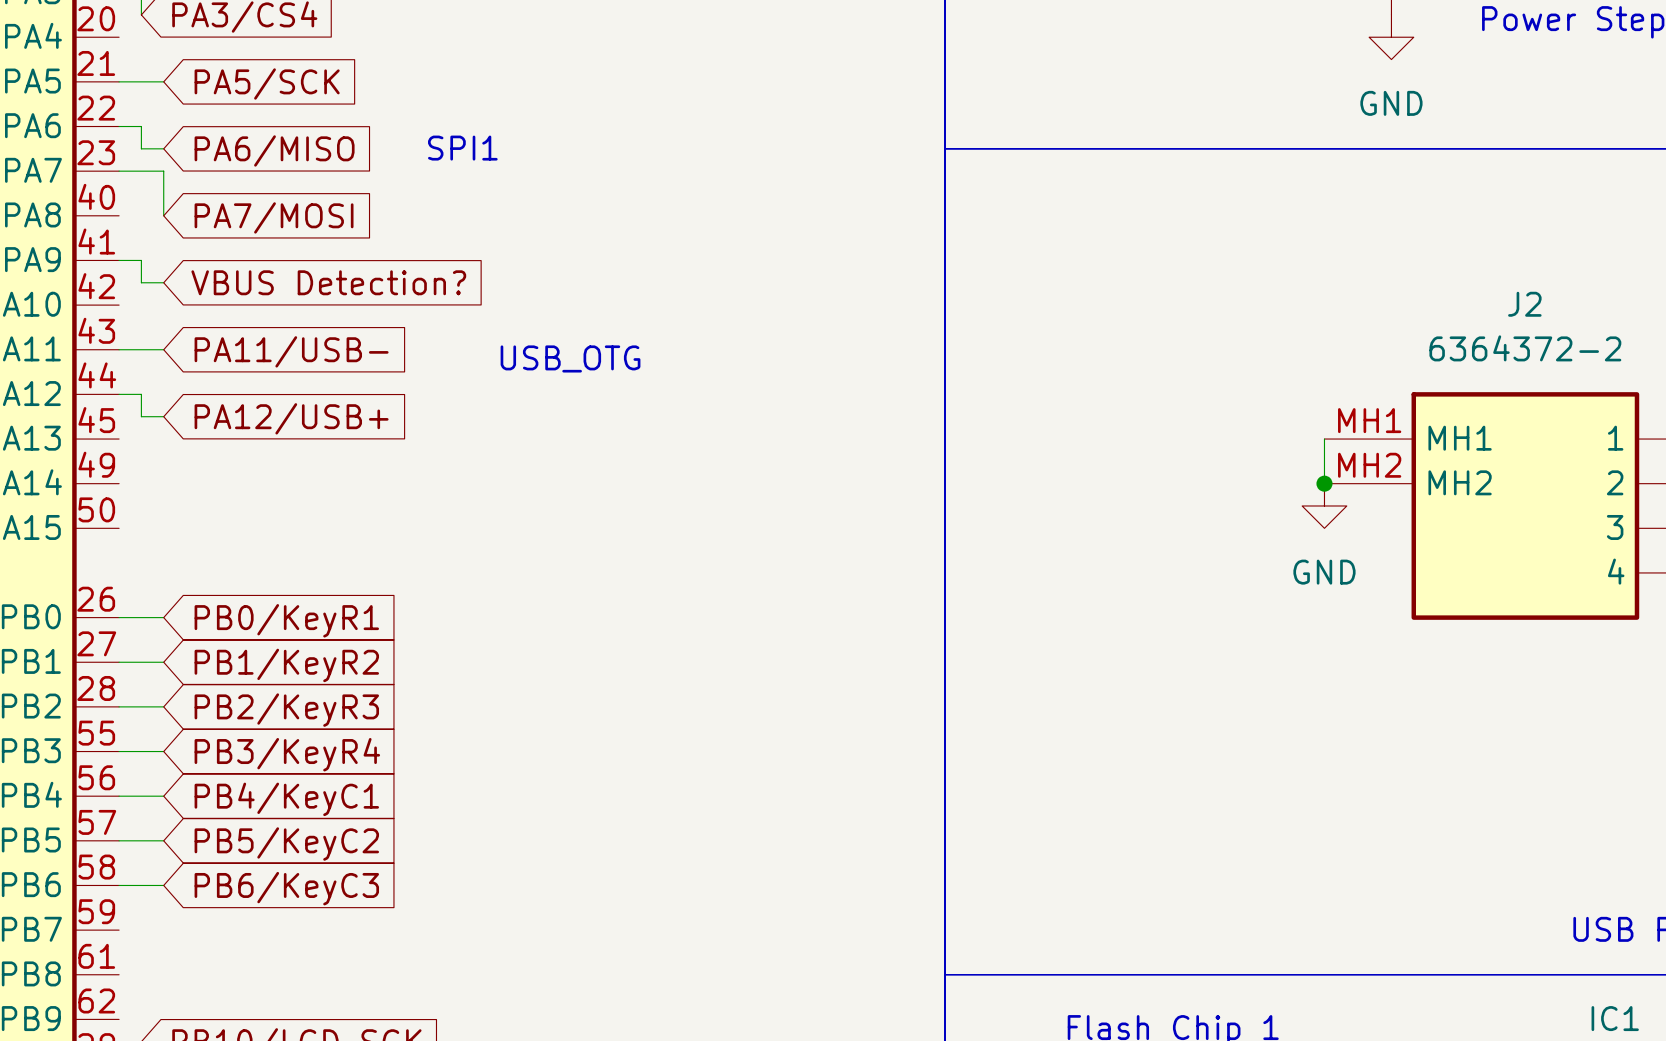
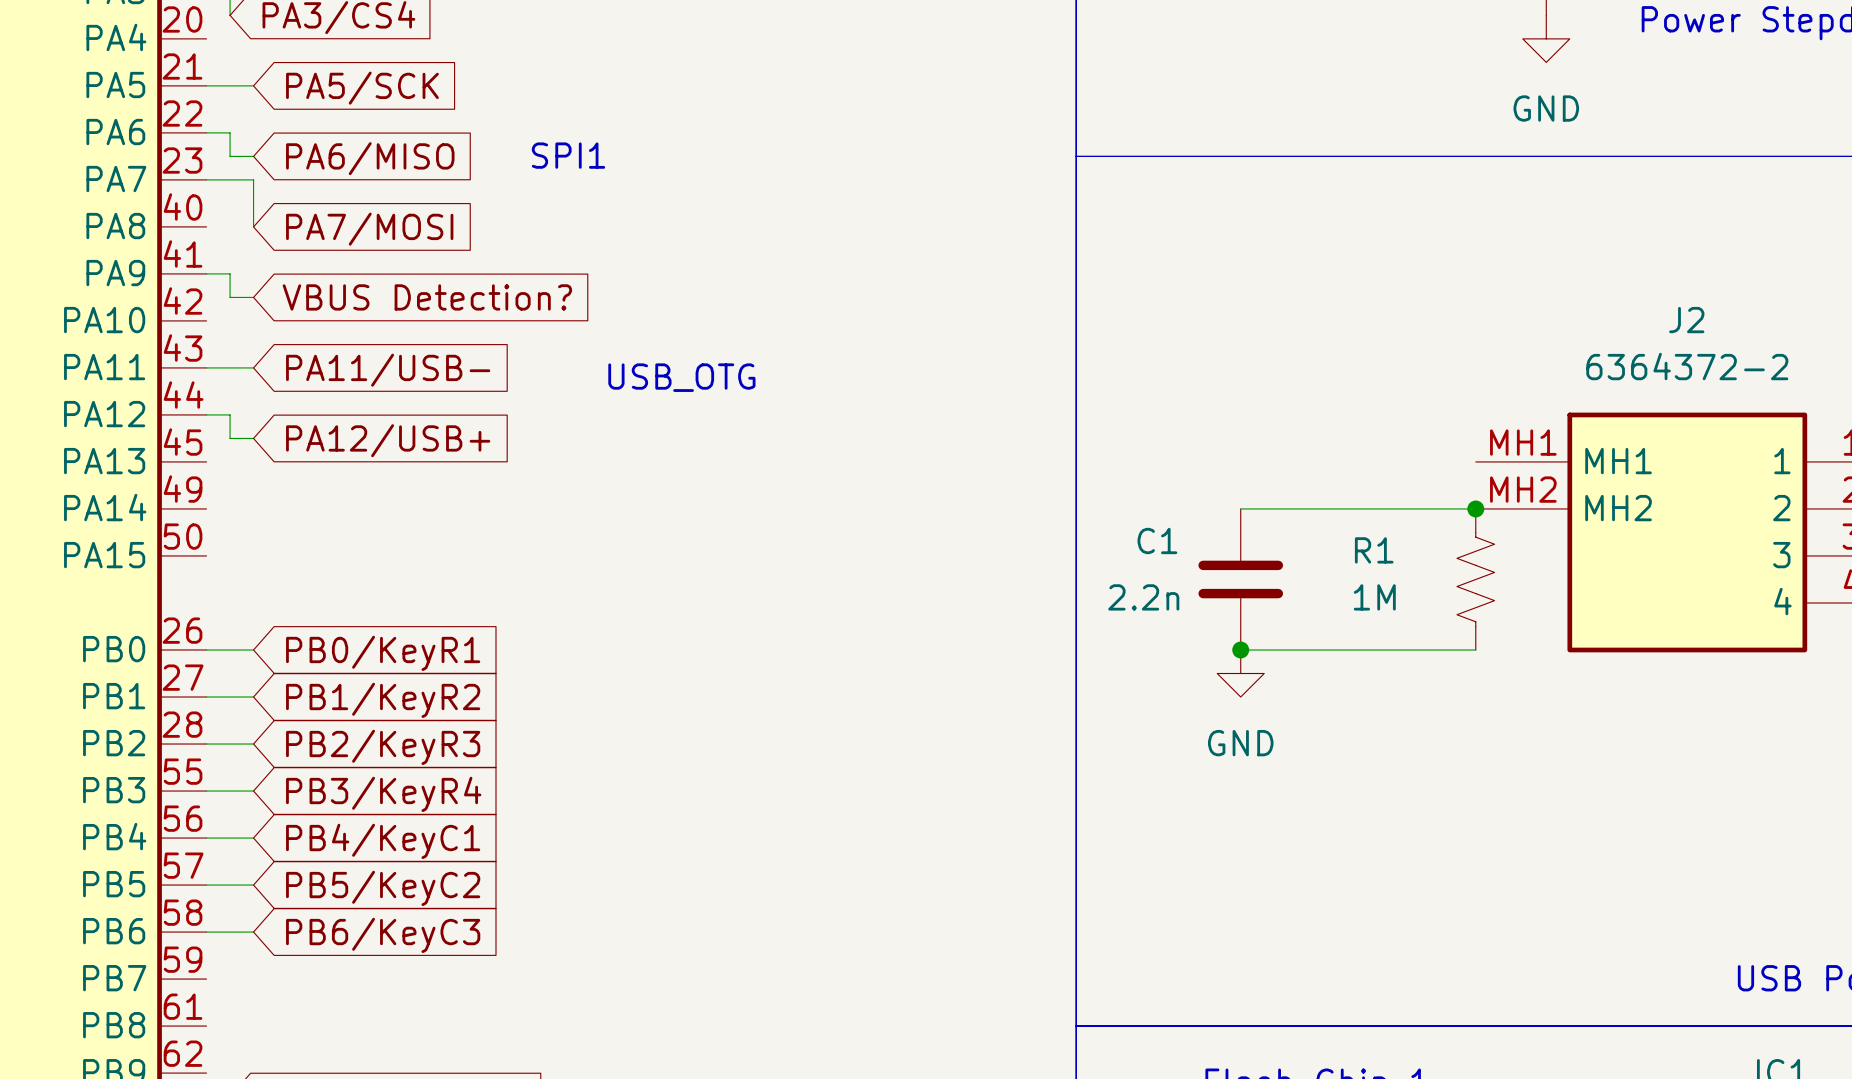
wire: (1324, 439) (1324, 483) -> (1240, 508) (1475, 508)
power symbol position: GND (1324, 505) -> GND (1240, 673)
C1: none -> 2.2n (1240, 579)
R1: none -> 1M (1475, 579)
wire: none -> (1240, 649) (1475, 649)
junction: none -> (1240, 649)

